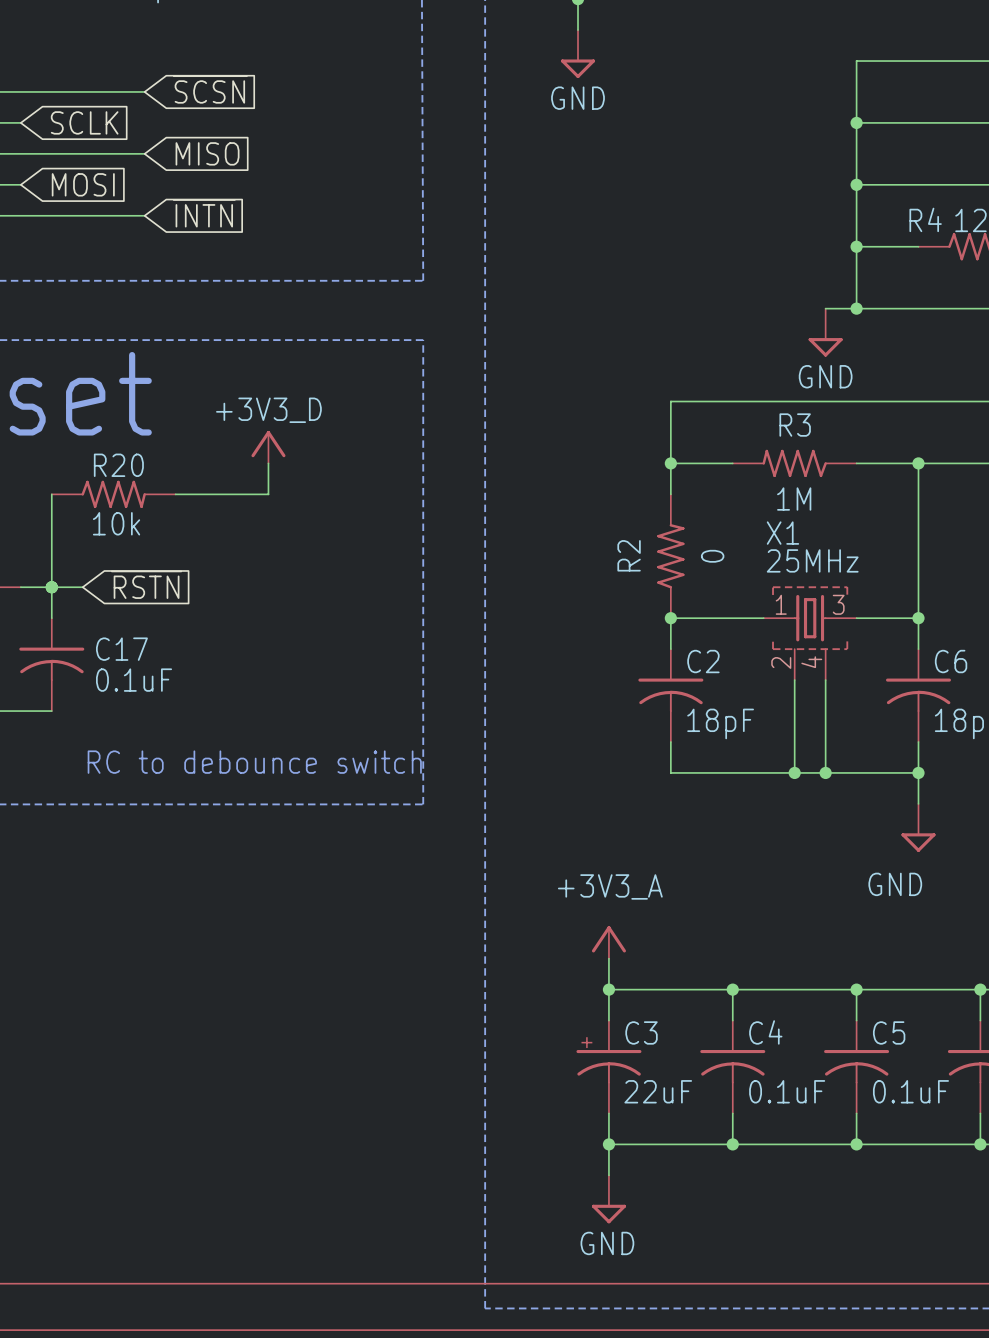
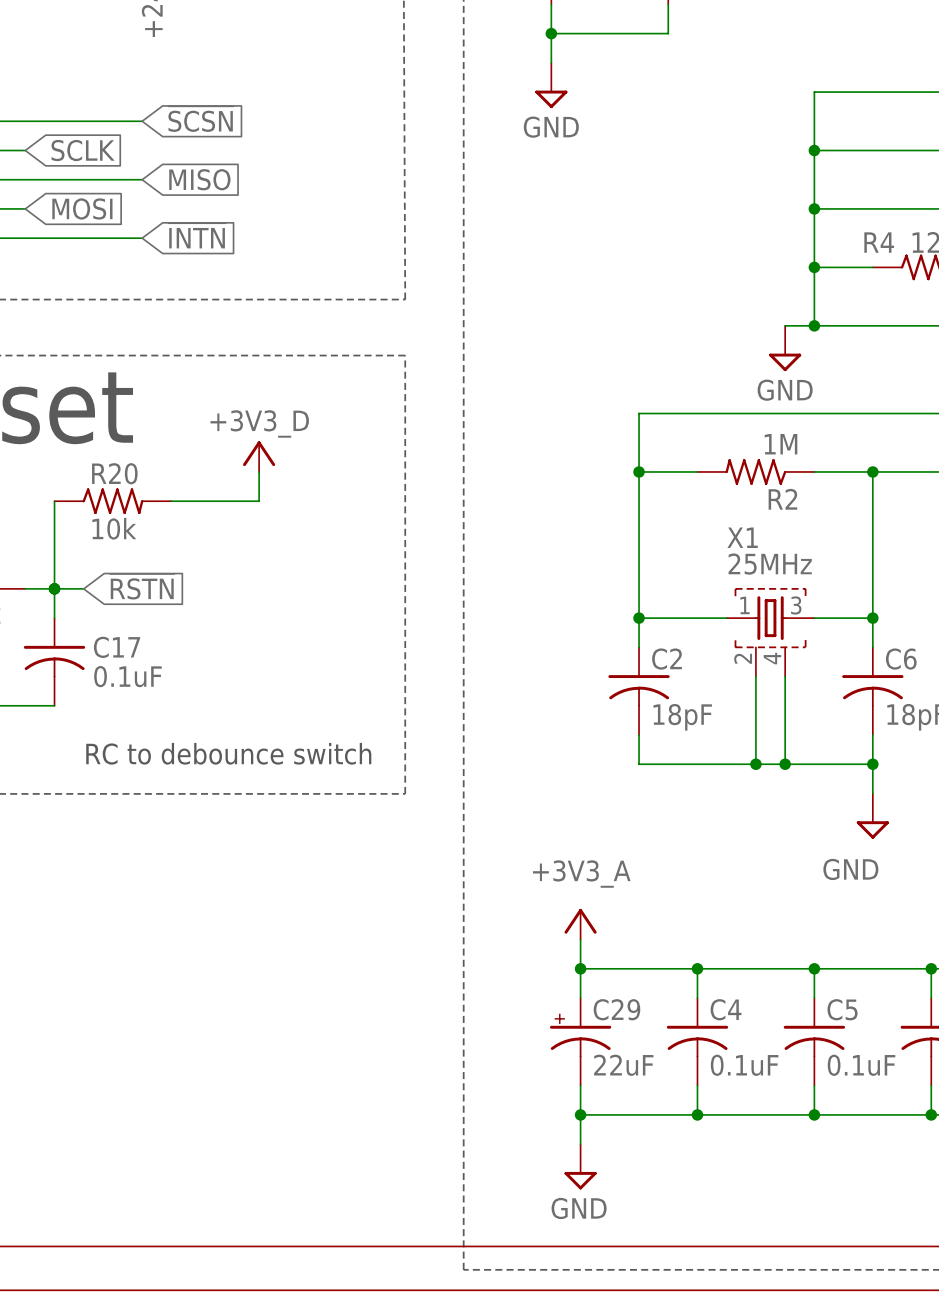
R3 name: R3 (795, 425) -> R2 (782, 499)
R3 value position: 1M (794, 499) -> 1M (780, 444)
R2: 0 (670, 556) -> none
C3 name: C3 (641, 1032) -> C29 (616, 1009)

